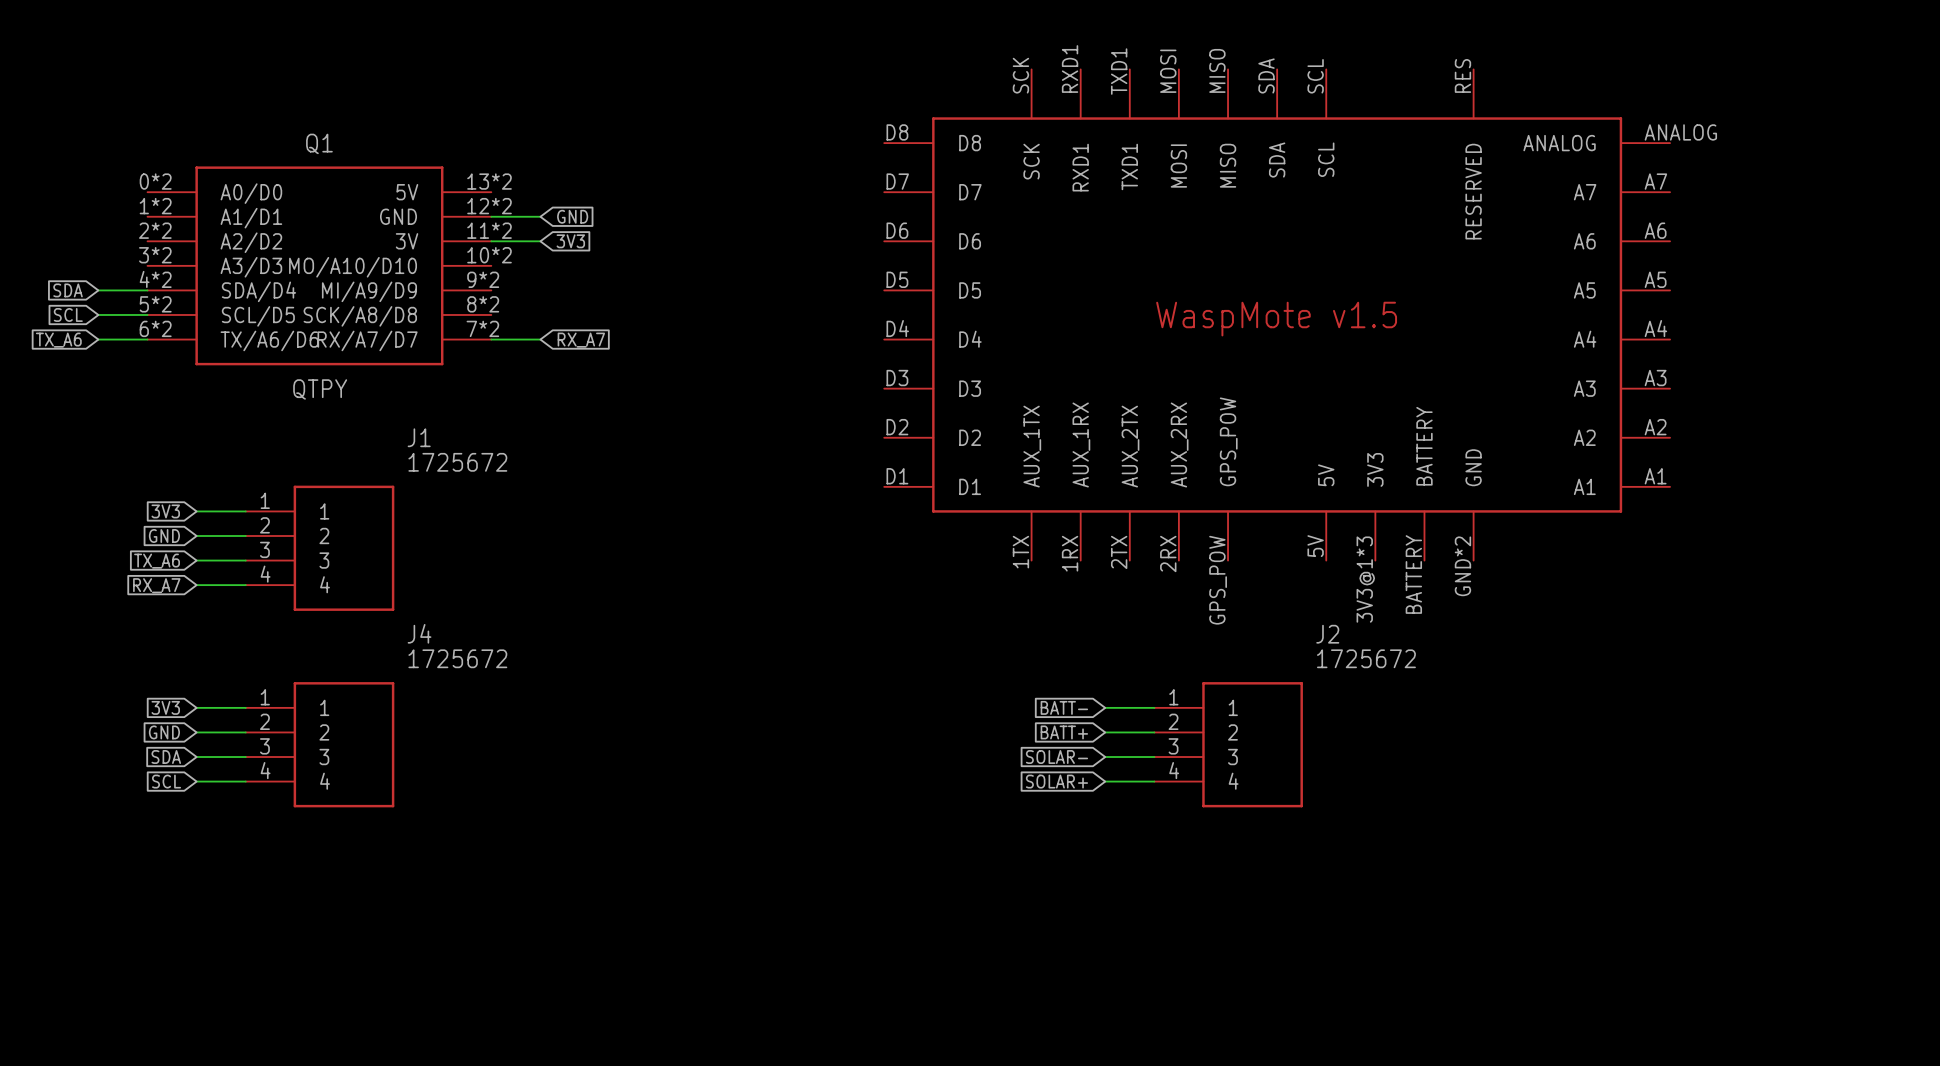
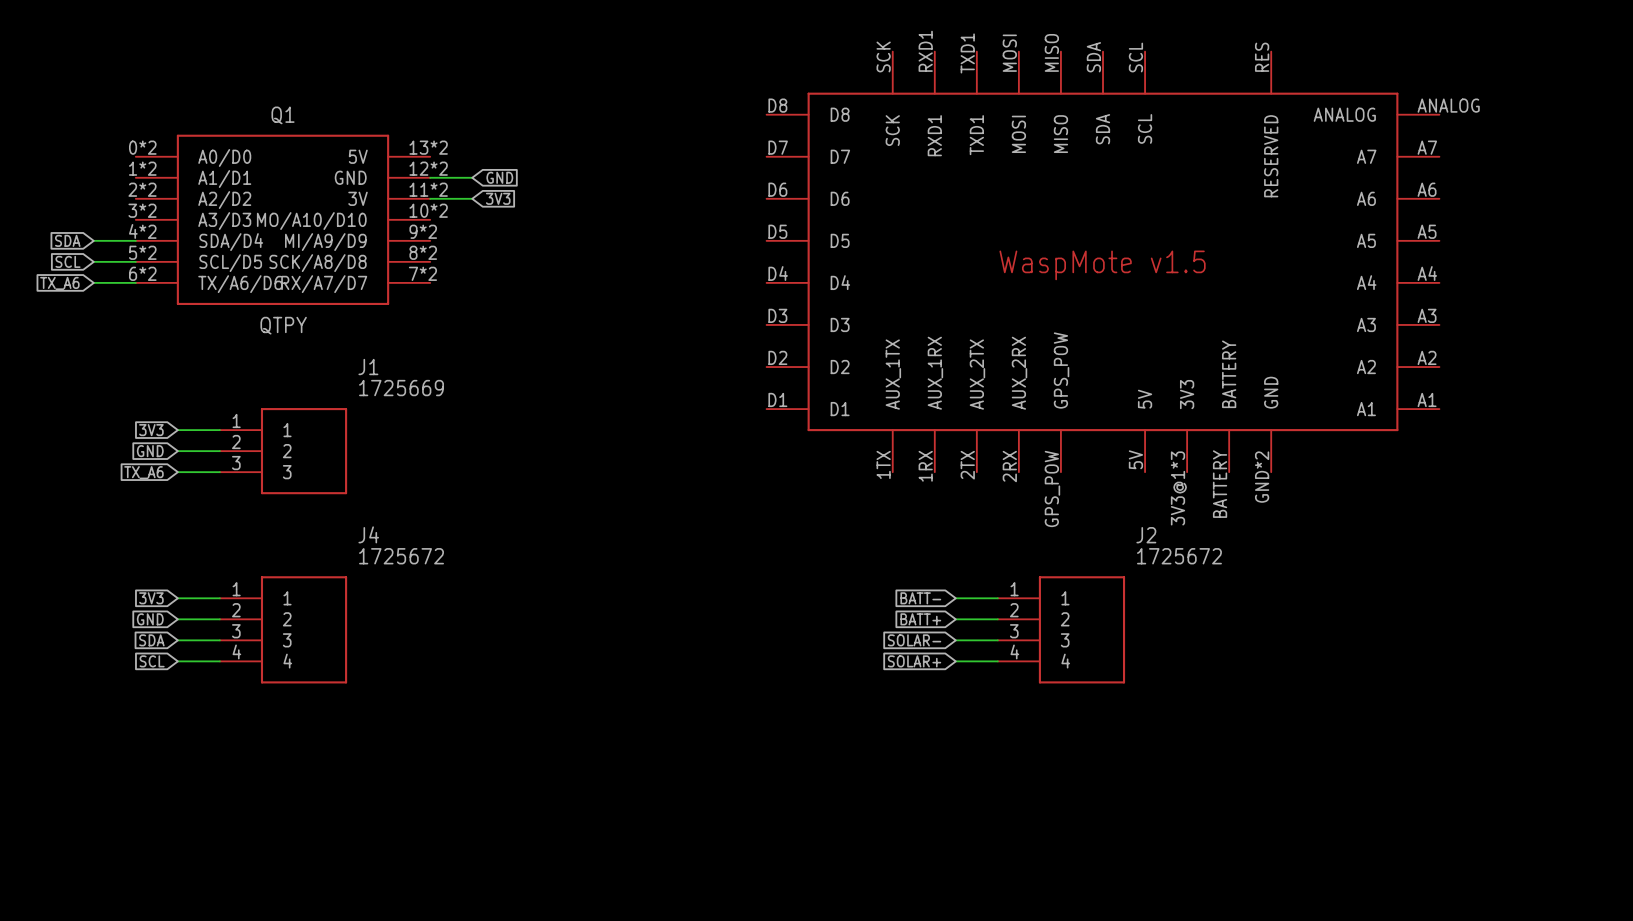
wire: (491, 339) (540, 339) -> none
global label: RX_A7 (581, 340) -> none
J1 value: 1725672 (457, 462) -> 1725669 (401, 388)
J1 symbol: [245, 485, 395, 611] -> [219, 408, 348, 495]
global label: RX_A7 (156, 585) -> none
wire: (196, 585) (245, 585) -> none

